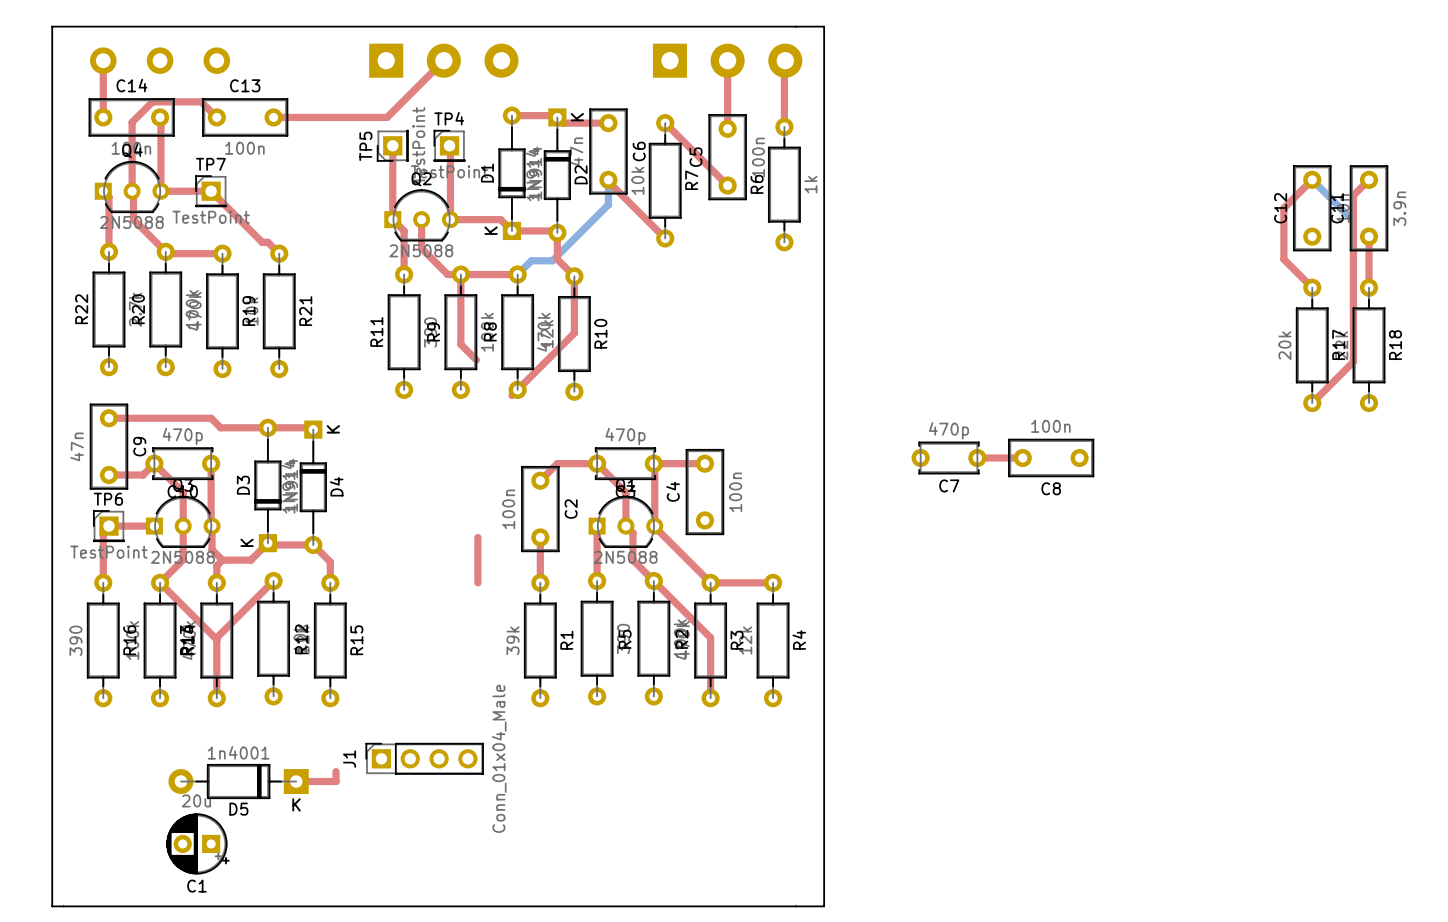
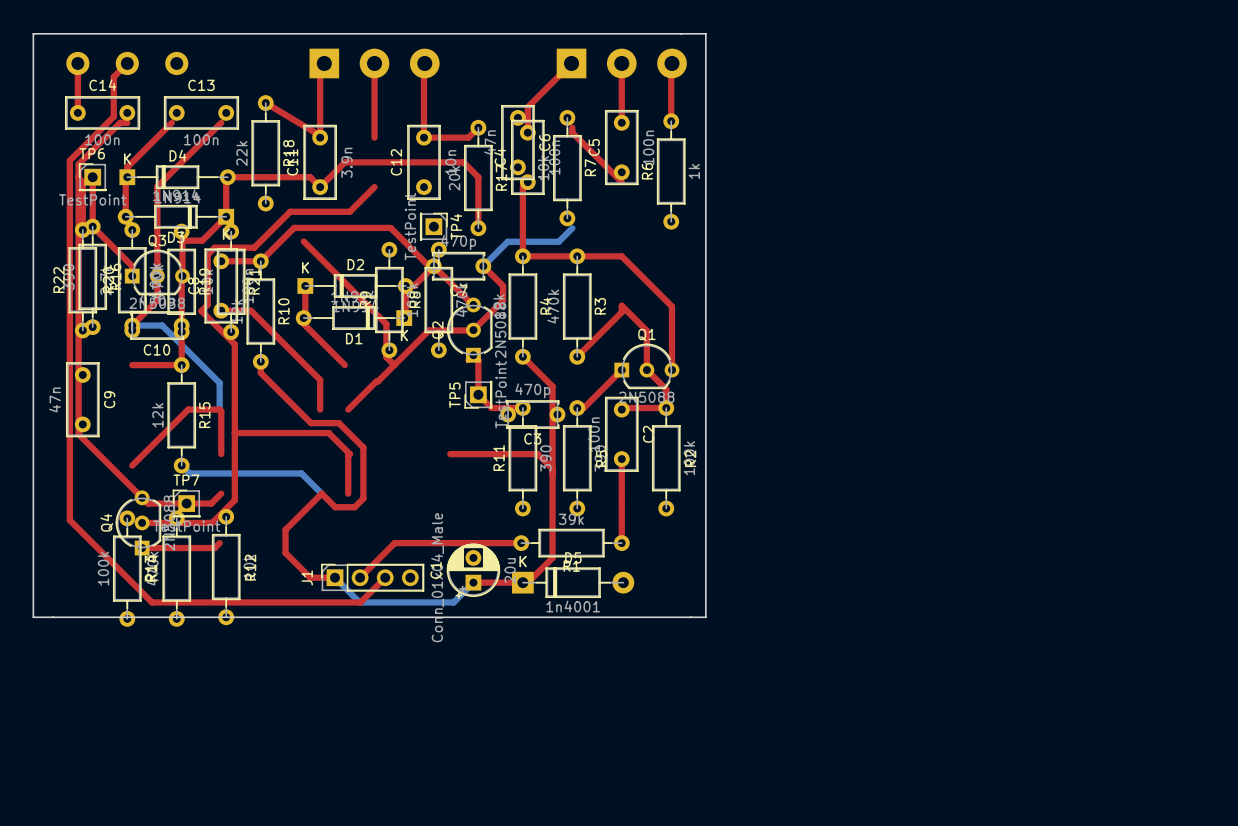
top track: none -> (127, 63) (113, 77) (113, 116) (69, 160) (69, 520) (152, 602) (360, 602) (385, 577)
top track: none -> (324, 63) (320, 67) (320, 137) (315, 132) (265, 103)
top track: (443, 60) (387, 117) (273, 117) -> (374, 63) (374, 137)
top track: none -> (424, 63) (423, 137) (468, 137) (478, 127)
top track: none -> (571, 63) (527, 107) (527, 132)
top track: (511, 115) (555, 115) (563, 123) (608, 123) -> none
top track: (160, 117) (160, 191) (211, 191) (262, 242) (267, 242) (279, 253) -> none
top track: (216, 117) (201, 101) (152, 101) (132, 122) (132, 191) (133, 219) (167, 253) (222, 253) -> none
top track: (665, 123) (727, 185) -> none
top track: none -> (127, 122) (120, 122) (78, 164) (78, 434) (147, 503) (211, 503) (221, 493)
top track: none -> (171, 122) (127, 167) (125, 216)
top track: none -> (221, 122) (157, 186) (157, 300) (132, 325)
top track: none -> (572, 127) (572, 132) (621, 182)
top track: (392, 145) (392, 219) (404, 230) (404, 274) -> none
TP5 position: (392, 145) -> (478, 394)
top track: (449, 145) (450, 219) (500, 219) (511, 230) (555, 230) (557, 232) (557, 259) (574, 276) (574, 333) (511, 395) -> none
TP4 rotation: 0° (449, 145) -> 90° clockwise (433, 226)
TP4 position: (449, 145) -> (433, 226)
D1 rotation: 0° (511, 173) -> 90° counterclockwise (353, 318)
D1 position: (511, 173) -> (353, 318)
D2 rotation: 0° (557, 175) -> 90° counterclockwise (355, 285)
D2 position: (557, 175) -> (355, 285)
top track: (608, 179) (665, 238) -> none
bottom track: (608, 179) (608, 204) (552, 260) (531, 260) (517, 274) -> none
top track: (1312, 179) (1283, 208) (1283, 259) (1312, 287) -> none
bottom track: (1312, 179) (1347, 214) -> none
top track: (1369, 179) (1353, 195) (1353, 361) (1312, 403) -> none
Q4 rotation: 0° (132, 186) -> 90° counterclockwise (138, 522)
Q4 position: (132, 186) -> (138, 522)
top track: none -> (92, 177) (92, 226) (132, 266) (132, 276)
TP7 position: (211, 191) -> (186, 503)
top track: none -> (527, 182) (522, 187) (522, 256) (621, 256) (672, 306) (672, 370)
top track: none -> (374, 187) (349, 211) (290, 211) (254, 247) (214, 247) (207, 254) (207, 304) (201, 311) (234, 344) (234, 500) (212, 522) (142, 522)
C12 position: (1312, 208) -> (423, 162)
C11 position: (1369, 208) -> (320, 162)
Q2 rotation: 0° (421, 215) -> 90° counterclockwise (469, 330)
Q2 position: (421, 215) -> (469, 330)
top track: (421, 219) (421, 248) (447, 274) (517, 274) -> none
top track: (1369, 236) (1369, 287) -> none
top track: none -> (478, 228) (478, 177) (463, 162) (344, 162) (320, 187) (310, 177) (227, 177) (226, 178) (226, 216) (202, 240) (182, 240) (181, 315)
bottom track: none -> (572, 228) (558, 241) (507, 241) (483, 266)
top track: none -> (303, 241) (386, 324) (386, 357) (394, 365)
top track: (460, 274) (460, 344) (476, 360) -> none
top track: none -> (221, 261) (260, 261) (294, 227) (390, 227) (428, 266) (433, 266)
top track: none -> (433, 266) (473, 304)
top track: none -> (433, 266) (414, 285) (405, 285) (405, 316) (404, 318)
top track: none -> (483, 266) (503, 285) (503, 300) (473, 330) (428, 330) (348, 409)
top track: none -> (305, 285) (303, 323) (344, 365)
R11 position: (404, 332) -> (522, 458)
R10 position: (574, 334) -> (260, 311)
top track: none -> (221, 310) (250, 310) (320, 379) (320, 409)
R17 position: (1312, 345) -> (478, 177)
R18 position: (1369, 345) -> (265, 153)
bottom track: none -> (132, 325) (162, 325) (219, 383) (219, 409)
top track: none -> (181, 325) (181, 365) (132, 365)
top track: none -> (522, 356) (552, 386) (552, 557) (527, 582) (473, 582)
top track: none -> (577, 356) (621, 312) (621, 305) (646, 330) (646, 370) (666, 389) (666, 408) (623, 408) (621, 409)
top track: none -> (468, 360) (473, 355) (478, 360) (478, 394) (491, 408) (522, 408)
top track: none -> (260, 361) (260, 372) (311, 423) (338, 423) (363, 447) (363, 498) (354, 507) (335, 507) (321, 493) (285, 529) (285, 553) (310, 577) (334, 577)
top track: none -> (621, 370) (583, 408) (577, 408)
top track: (108, 418) (211, 418) (220, 427) (311, 427) (313, 429) -> none
C7 position: (949, 457) -> (458, 266)
top track: (977, 457) (1022, 457) -> none
C8 rotation: 0° (1051, 457) -> 90° clockwise (221, 285)
C8 position: (1051, 457) -> (221, 285)
C10 position: (182, 463) -> (156, 325)
top track: (211, 463) (212, 549) (222, 560) -> none
top track: (704, 463) (653, 463) (654, 527) (710, 582) (773, 582) -> none
top track: (108, 475) (143, 475) (154, 463) (183, 492) (183, 559) (160, 582) (216, 639) -> none
top track: (540, 480) (557, 463) (597, 463) (625, 492) (625, 526) (632, 533) (632, 560) (710, 637) (710, 698) -> none
top track: none -> (234, 433) (328, 433) (349, 454) (348, 455) (348, 493)
D3 rotation: 0° (267, 485) -> 90° counterclockwise (175, 216)
D3 position: (267, 485) -> (175, 216)
D4 rotation: 0° (313, 487) -> 90° counterclockwise (177, 177)
D4 position: (313, 487) -> (177, 177)
C4 position: (704, 492) -> (527, 157)
top track: none -> (221, 454) (221, 411) (219, 409) (188, 409) (132, 465)
top track: none -> (450, 454) (537, 454) (552, 468)
C2 position: (540, 509) -> (621, 434)
top track: none -> (621, 459) (621, 543)
Q3 position: (183, 521) -> (157, 272)
Q1 position: (625, 521) -> (646, 366)
bottom track: none -> (181, 465) (189, 473) (301, 473) (321, 493)
TP6 position: (108, 526) -> (92, 177)
top track: (154, 526) (108, 526) (103, 531) (103, 582) -> none
top track: (597, 526) (597, 581) -> none
top track: (477, 537) (477, 582) -> none
top track: (540, 537) (540, 582) -> none
top track: (222, 560) (216, 565) (216, 582) -> none
top track: (222, 560) (250, 560) (267, 543) (269, 544) (313, 544) (330, 561) (330, 582) -> none
top track: (273, 581) (216, 637) (216, 698) -> none
top track: none -> (219, 543) (214, 548) (142, 548)
top track: none -> (521, 543) (394, 543) (360, 577)
R5 position: (597, 638) -> (577, 458)
R2 position: (653, 638) -> (666, 458)
R16 position: (103, 640) -> (92, 276)
R15 position: (330, 640) -> (181, 415)
R1 rotation: 0° (540, 640) -> 90° clockwise (571, 543)
R1 position: (540, 640) -> (571, 543)
R3 position: (710, 640) -> (577, 306)
R4 position: (773, 640) -> (522, 306)
bottom track: none -> (334, 577) (359, 602) (453, 602) (473, 582)
board edge: (52, 696) (52, 906) (824, 906) (824, 696) -> (33, 617) (705, 617)
J1 position: (424, 758) -> (372, 577)
top track: (336, 771) (336, 781) (296, 781) -> none
D5 rotation: 0° (238, 781) -> 180° (573, 582)
D5 position: (238, 781) -> (573, 582)
C1 rotation: 0° (198, 843) -> 90° clockwise (473, 571)
C1 position: (198, 843) -> (473, 571)

